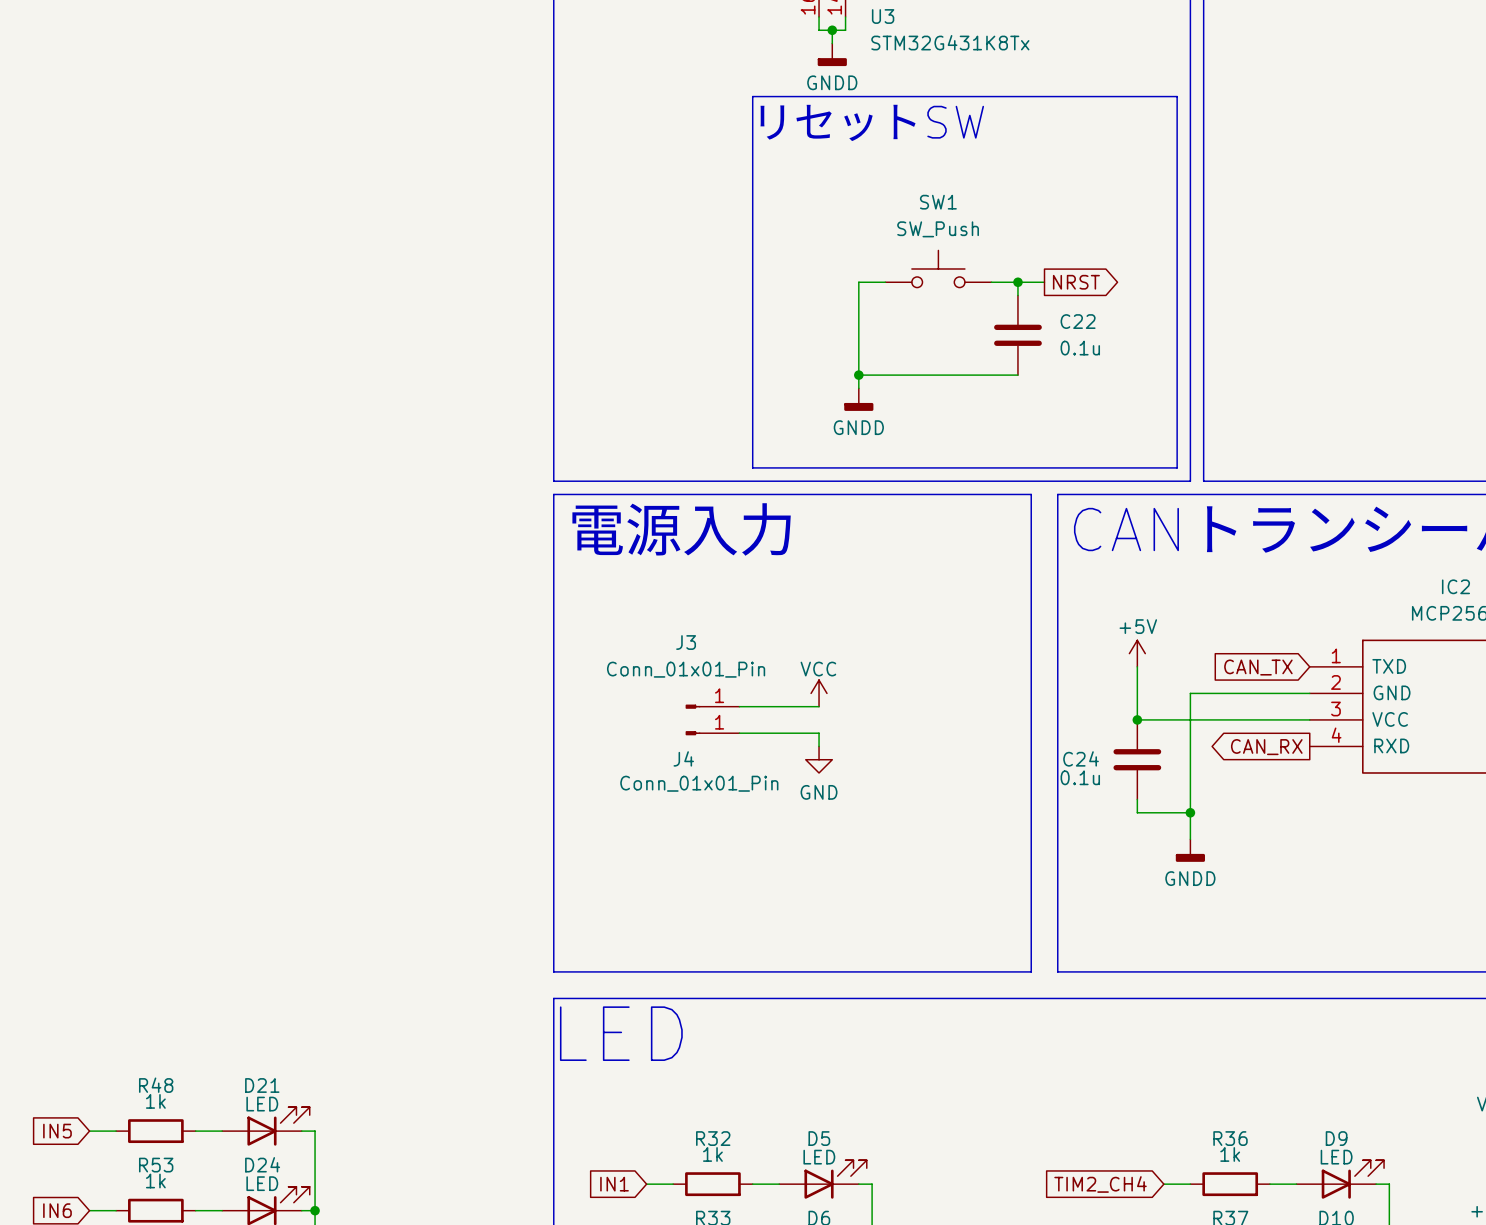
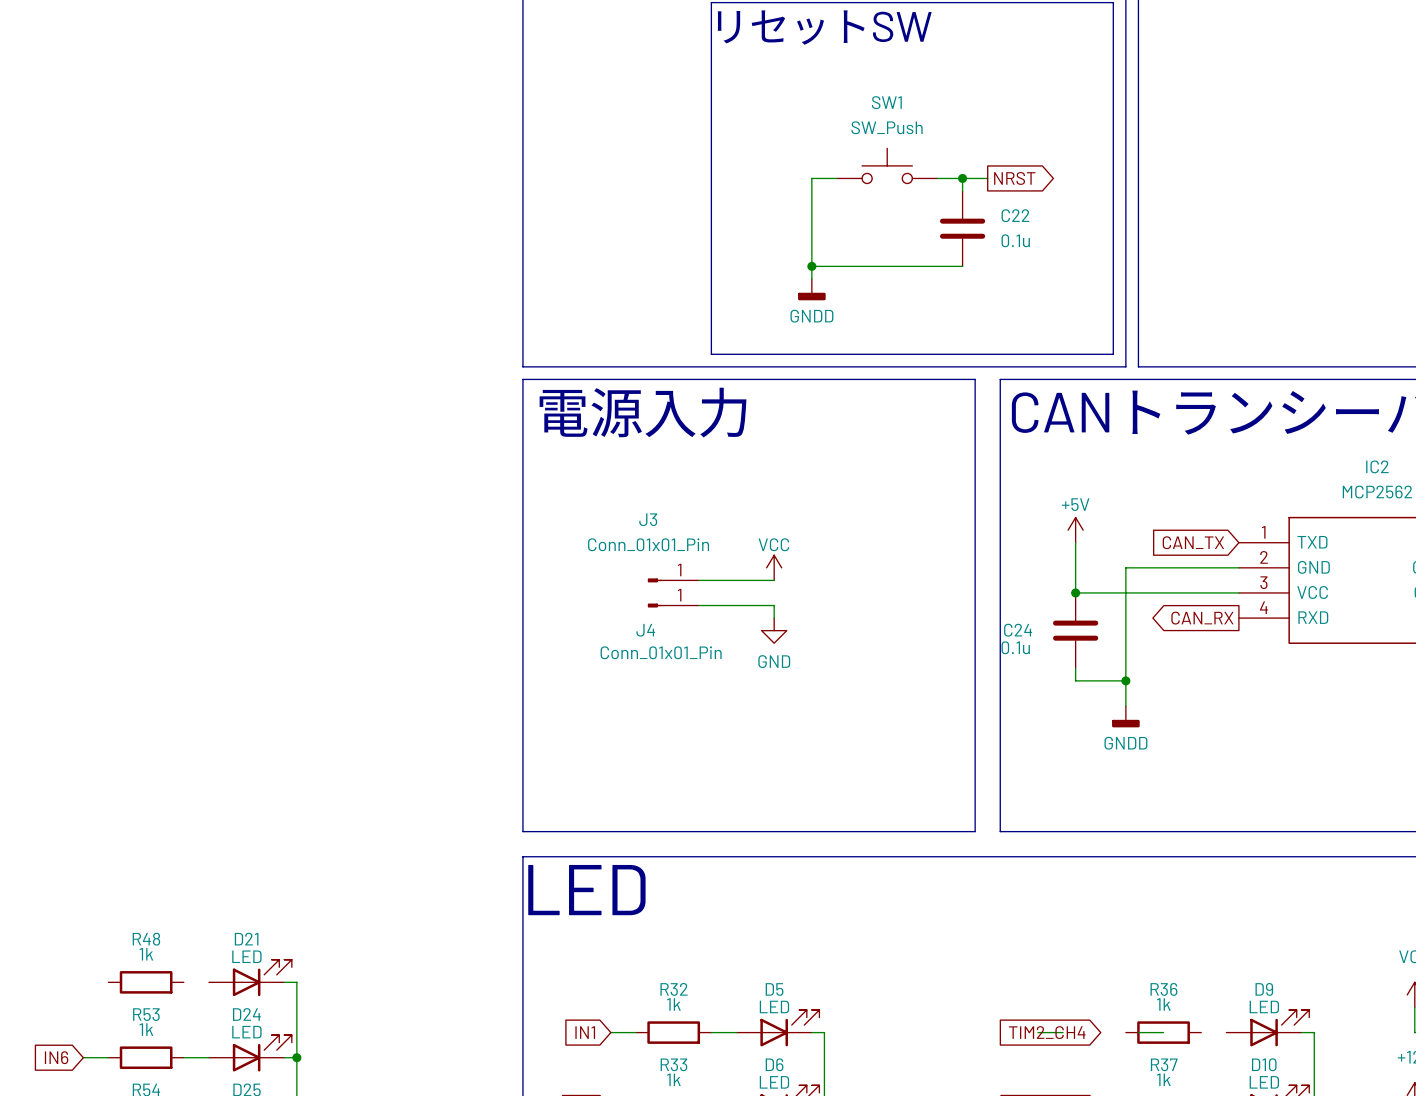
global label: IN5 (57, 1131) -> none
wire: (89, 1131) (116, 1131) -> none
wire: (195, 1131) (222, 1131) -> none
wire: (1163, 1184) (1190, 1184) -> (1037, 1032) (1063, 1032)
wire: (1269, 1184) (1296, 1184) -> (1138, 1032) (1163, 1032)

